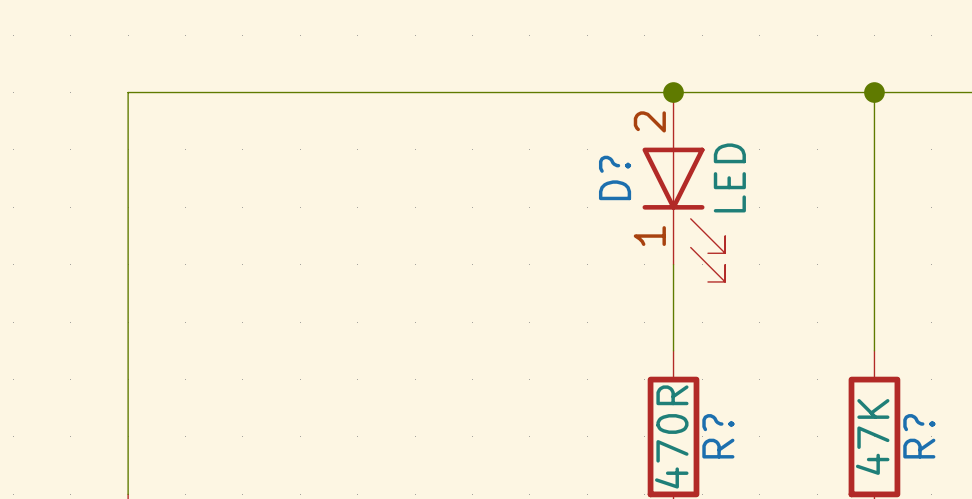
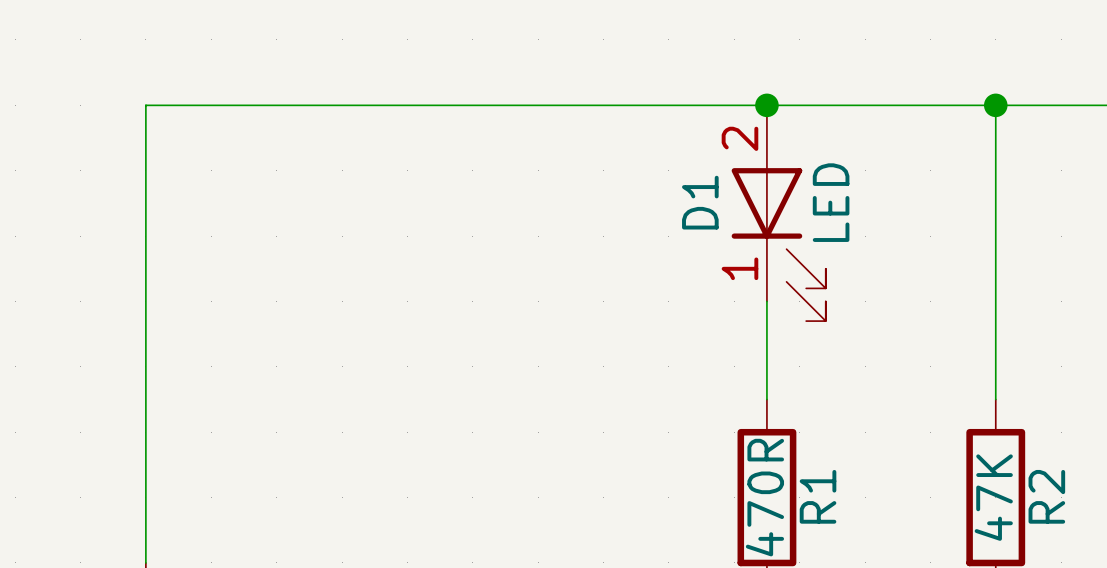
D? name: D? (615, 177) -> D1 (700, 202)
R? name: R? (718, 436) -> R1 (818, 496)
R? name: R? (919, 436) -> R2 (1046, 496)

